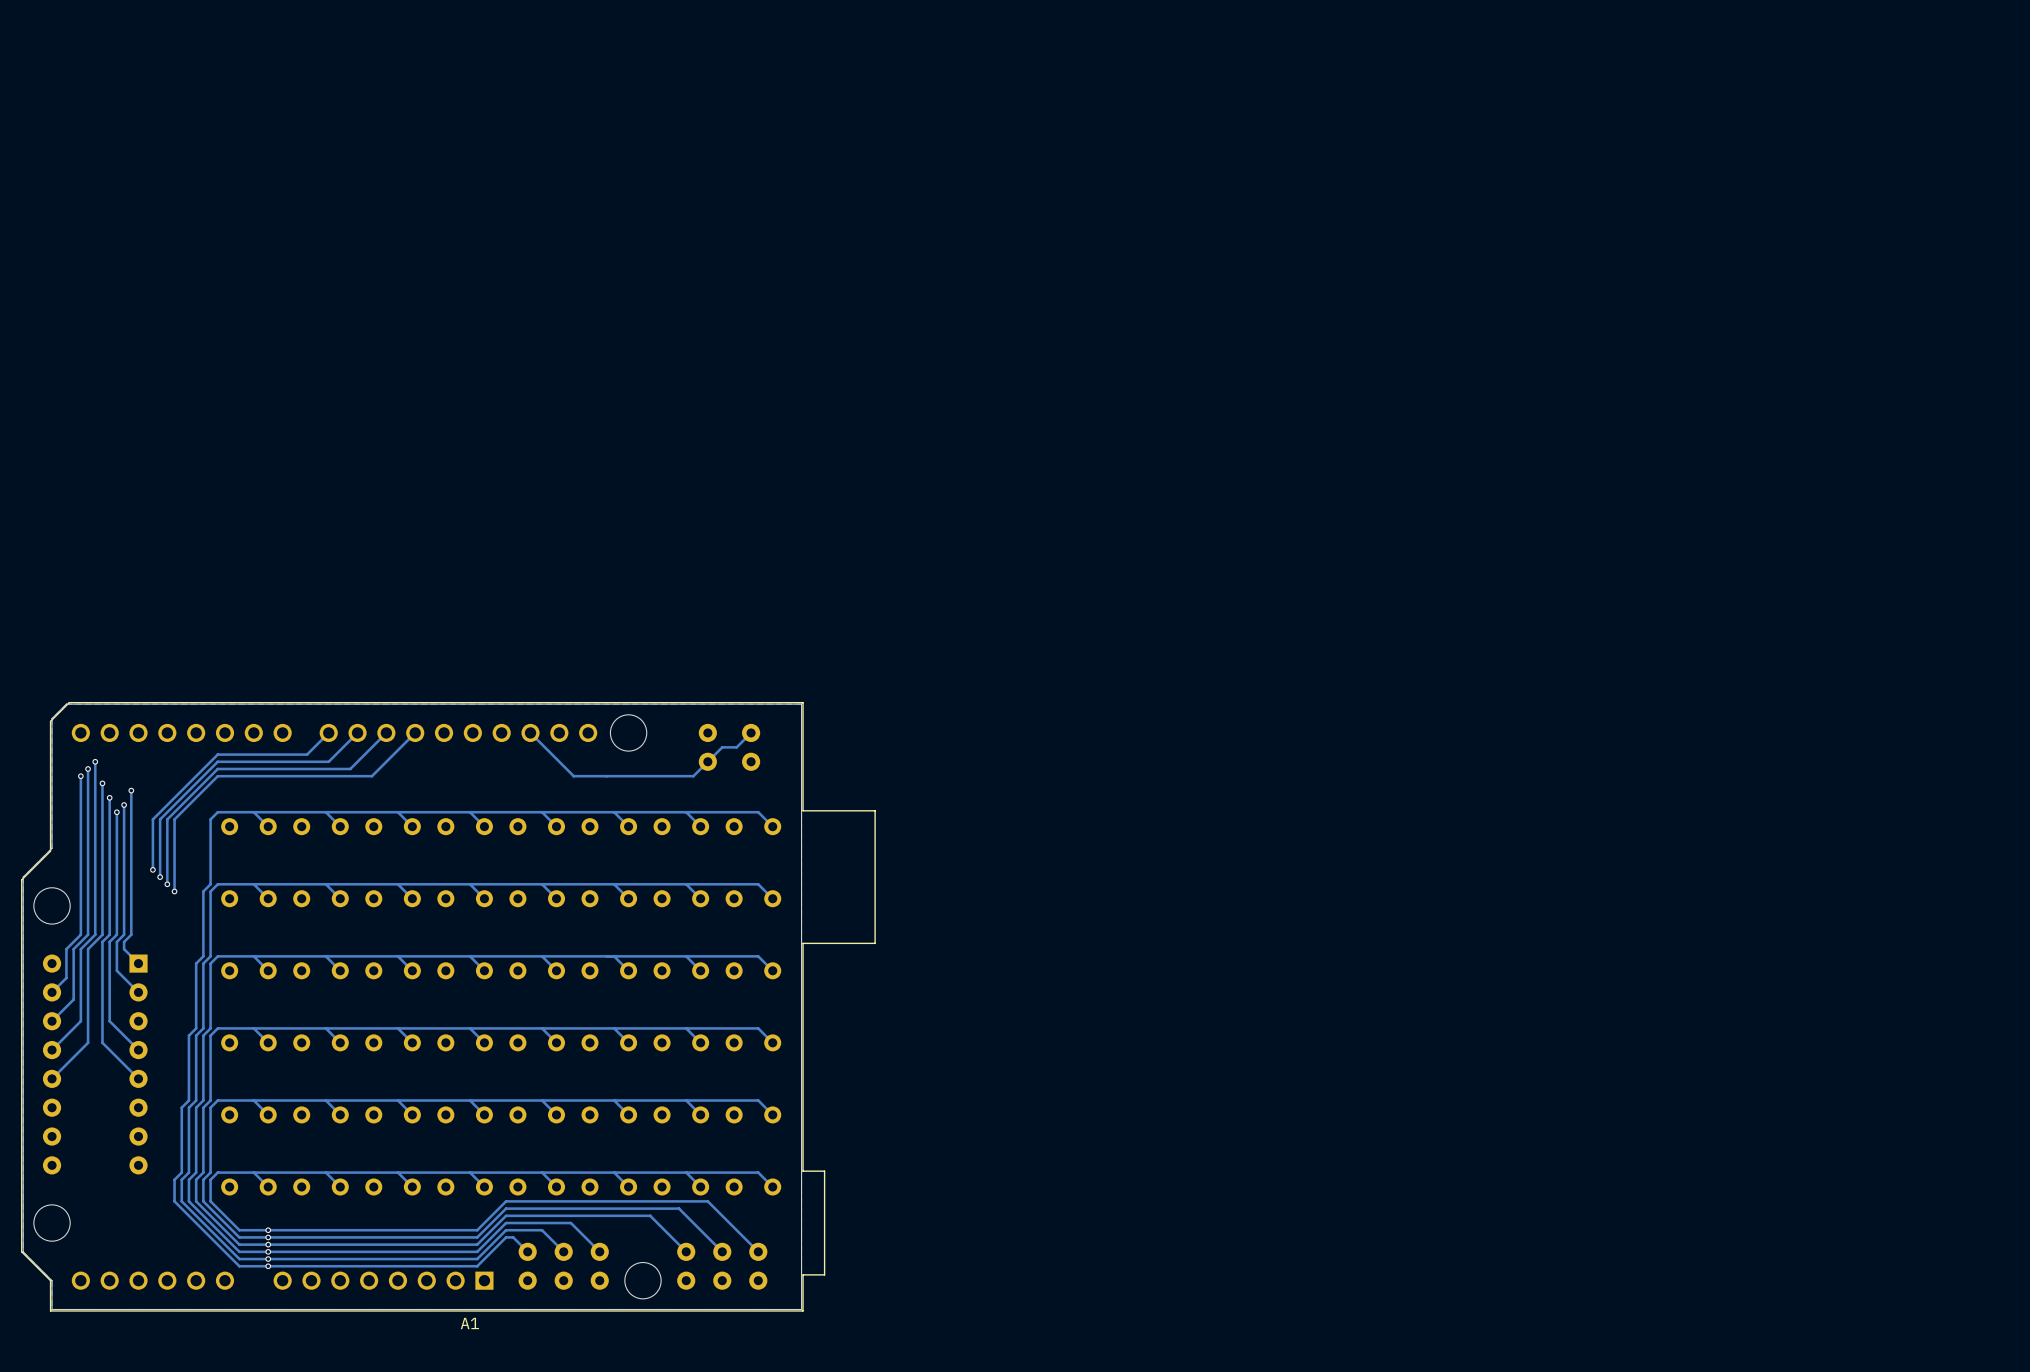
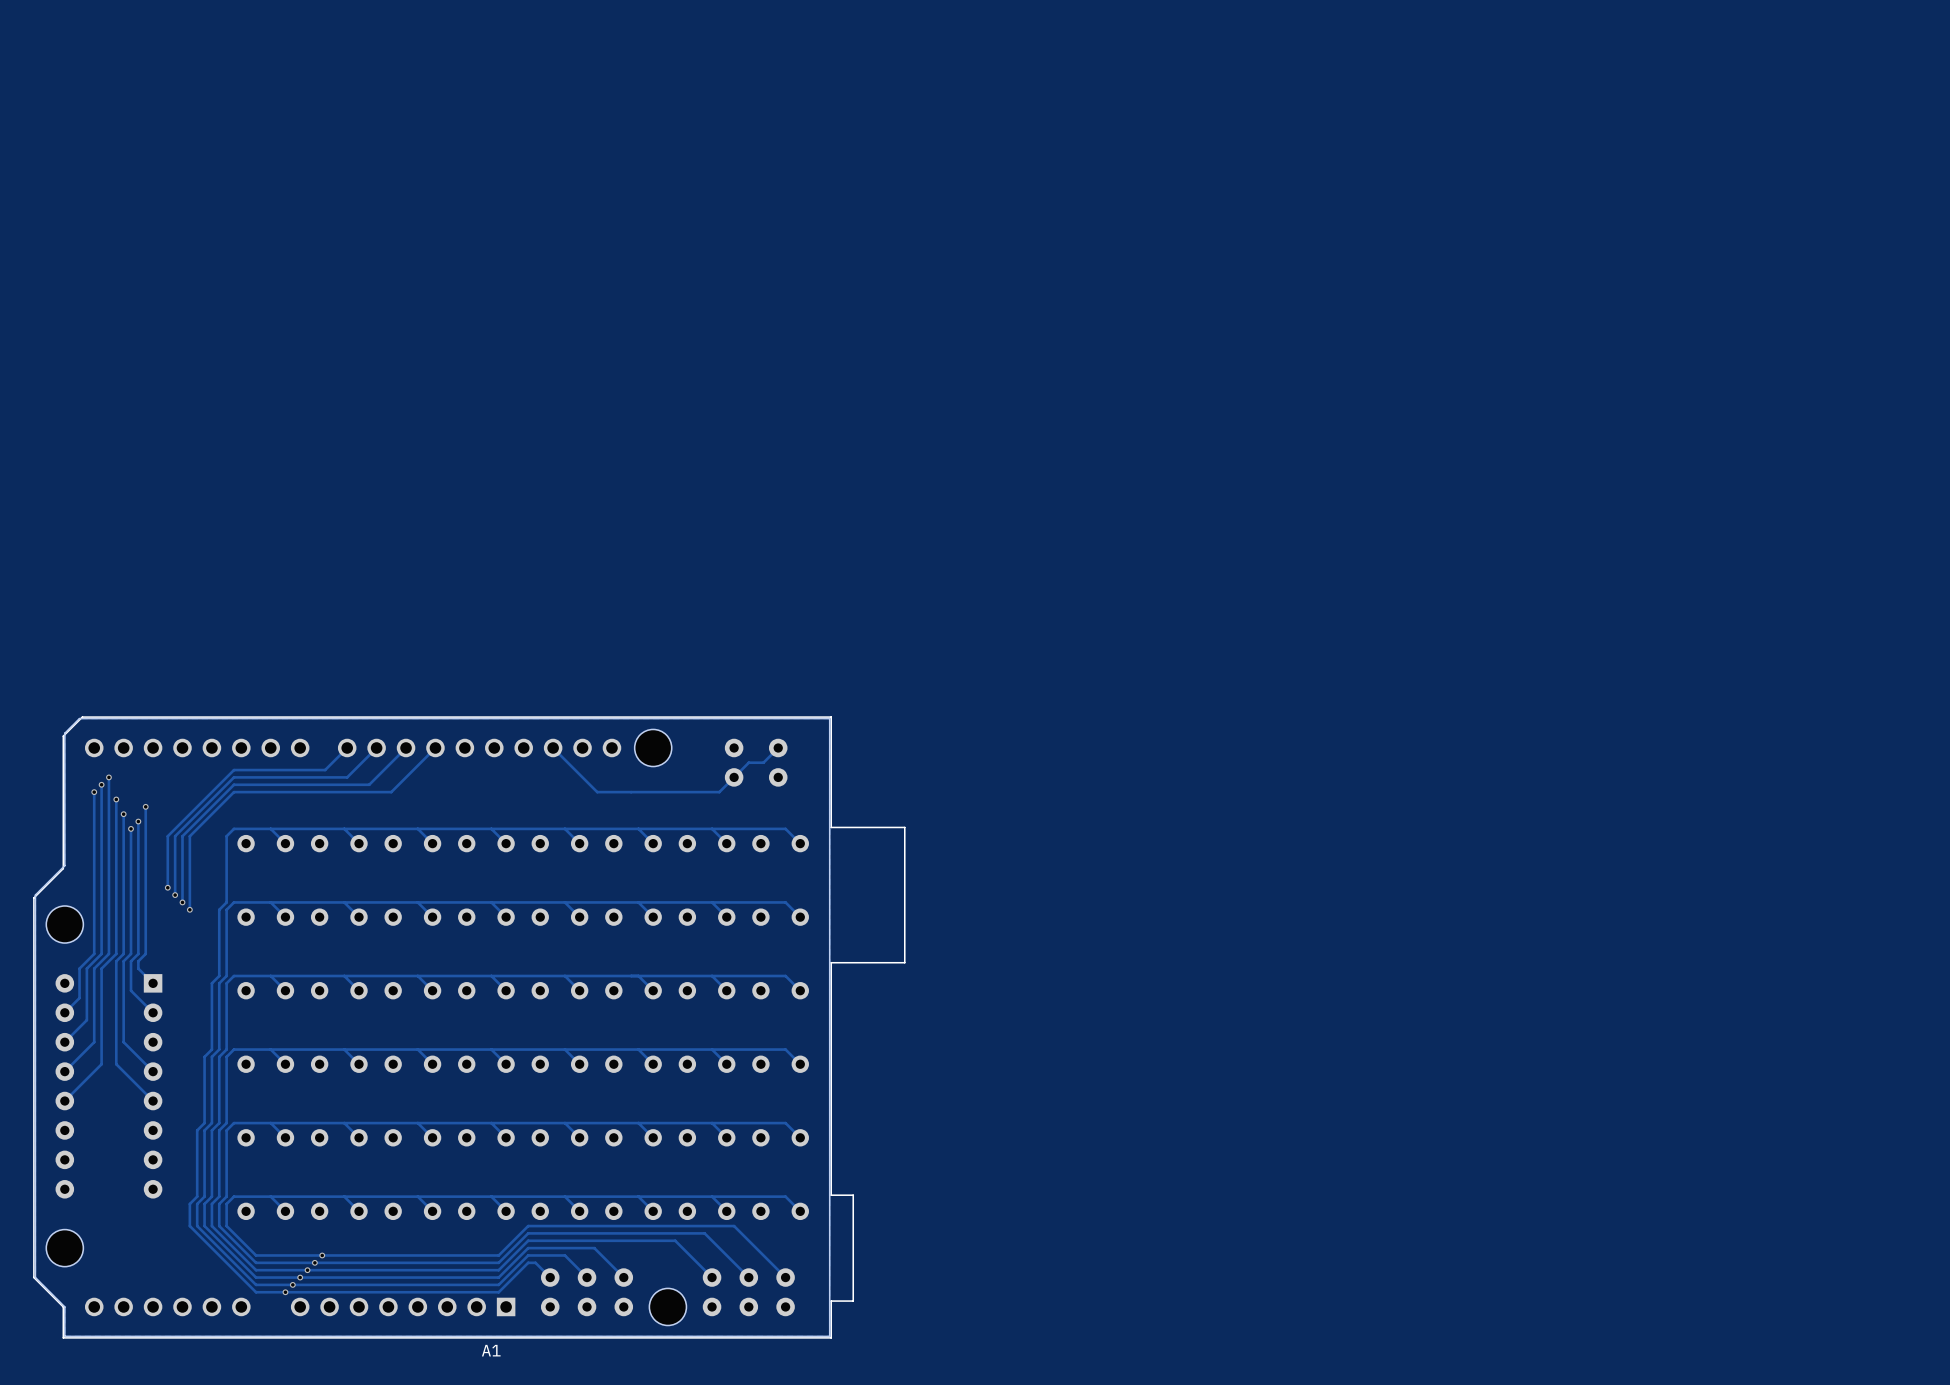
via: (268, 1230) -> none
via: none -> (322, 1255)
via: (268, 1237) -> none
via: none -> (314, 1262)
via: (268, 1244) -> none
via: none -> (307, 1270)
via: (268, 1251) -> none
via: none -> (300, 1277)
via: (268, 1259) -> none
via: none -> (292, 1284)

